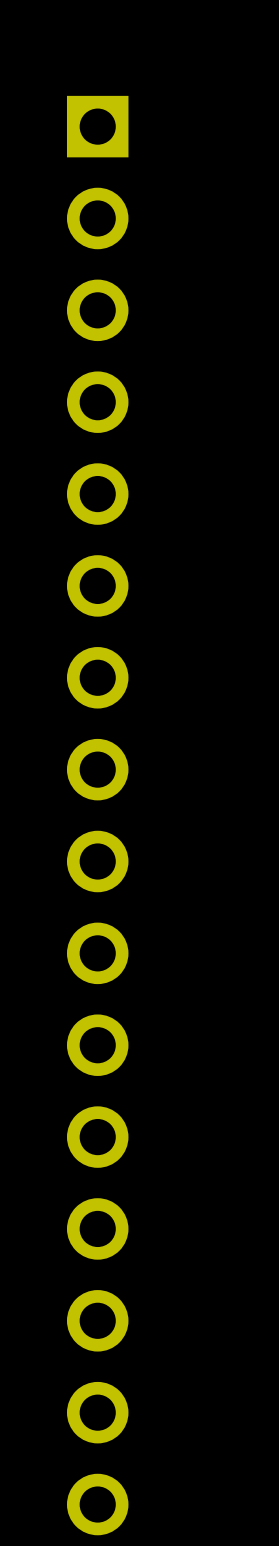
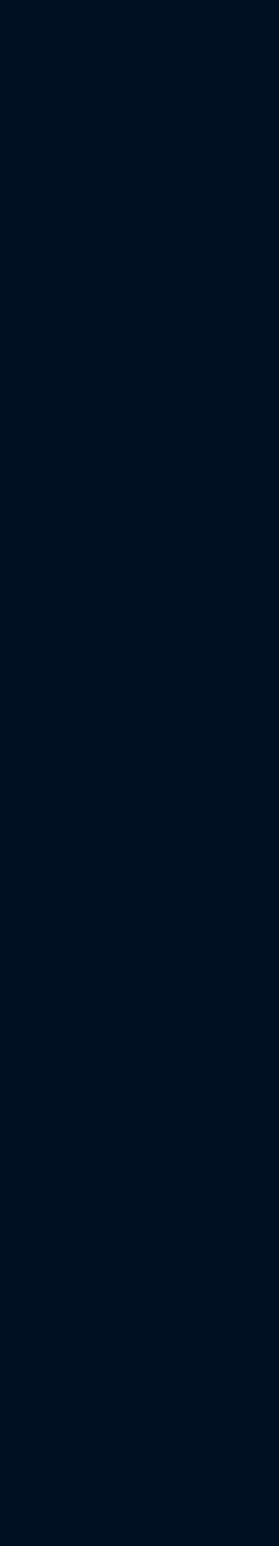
part: (97, 815) -> none

